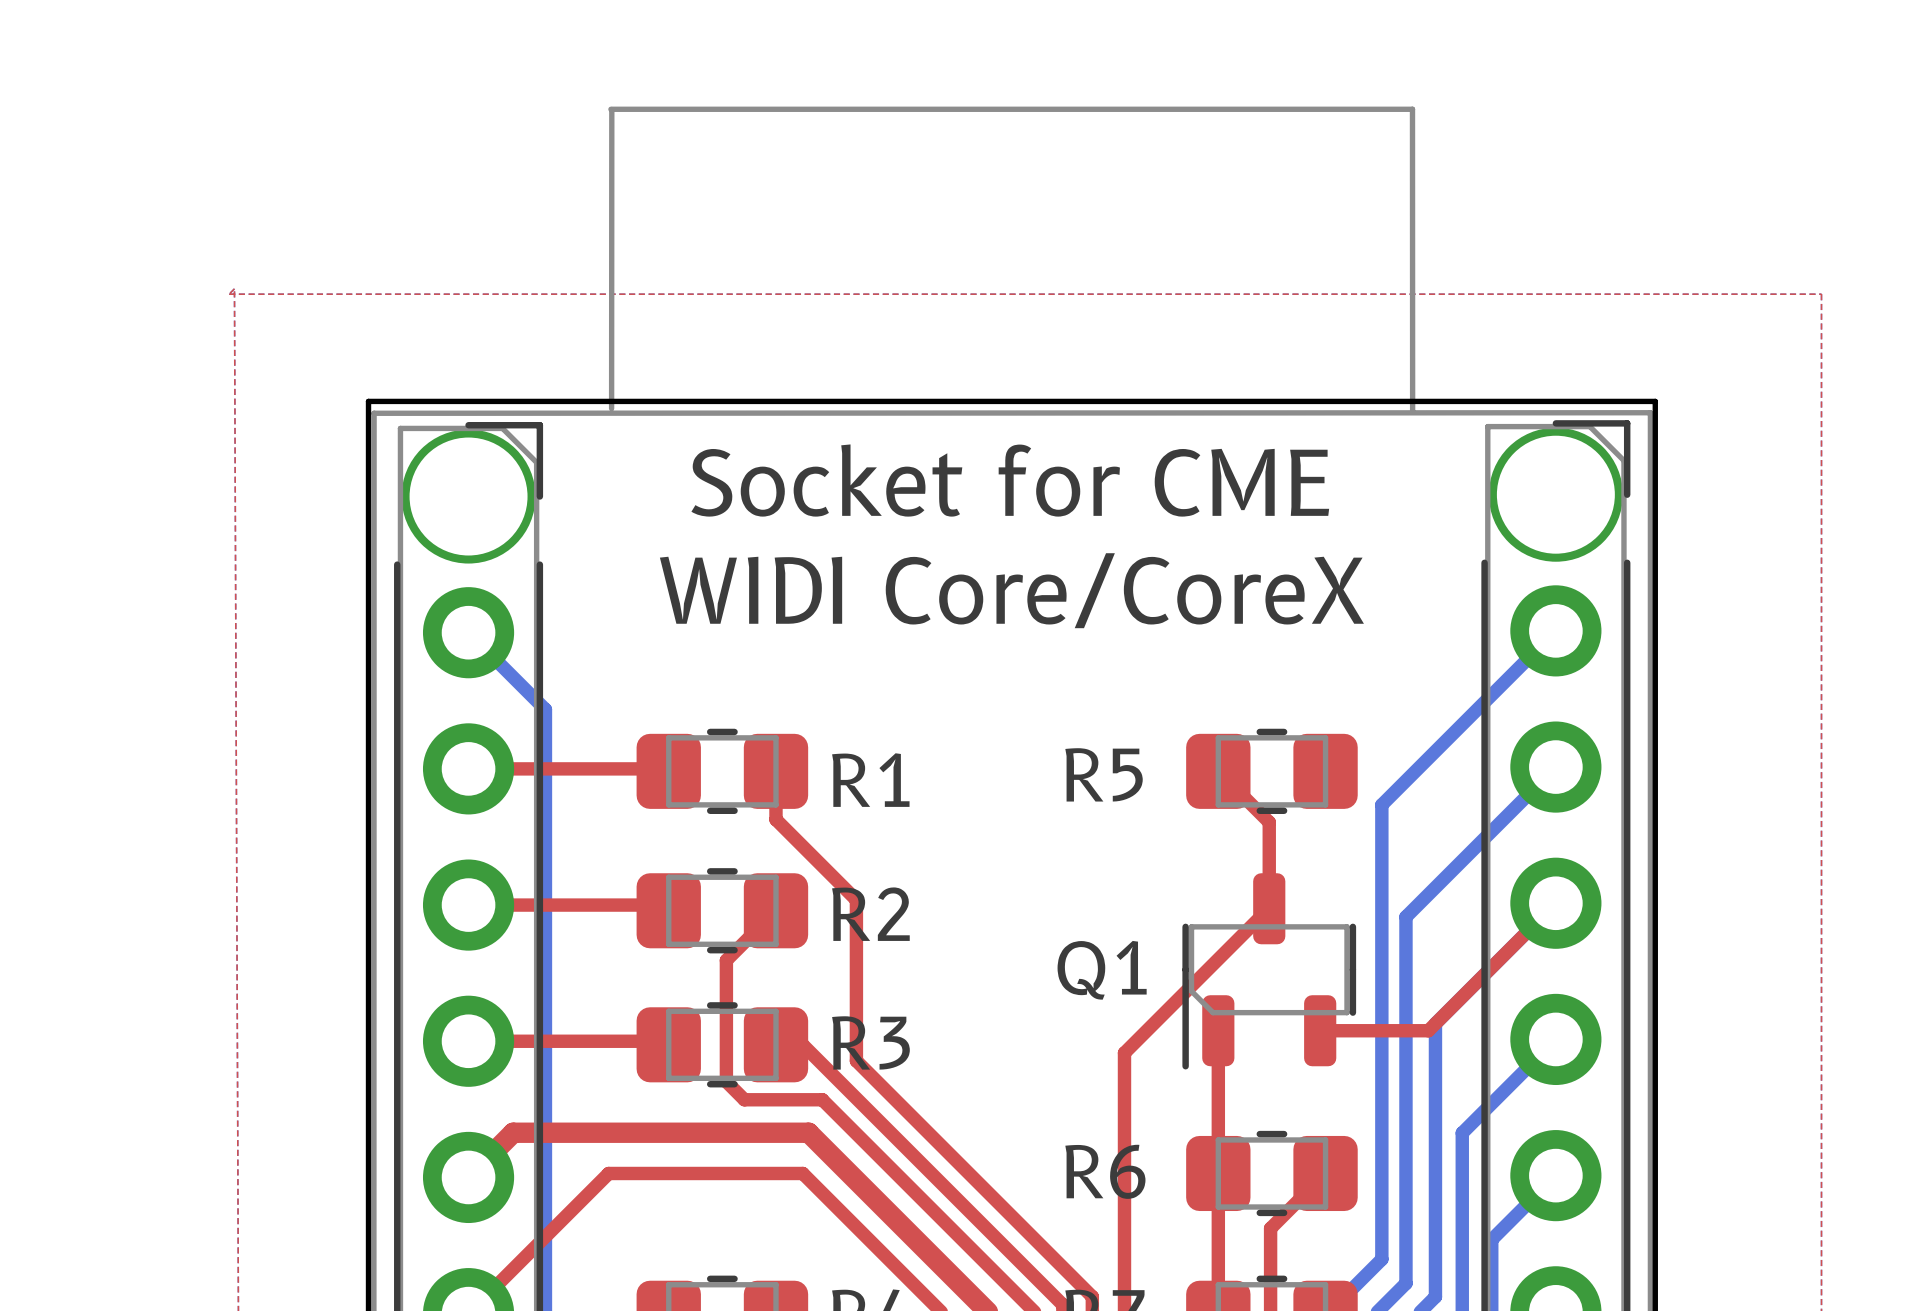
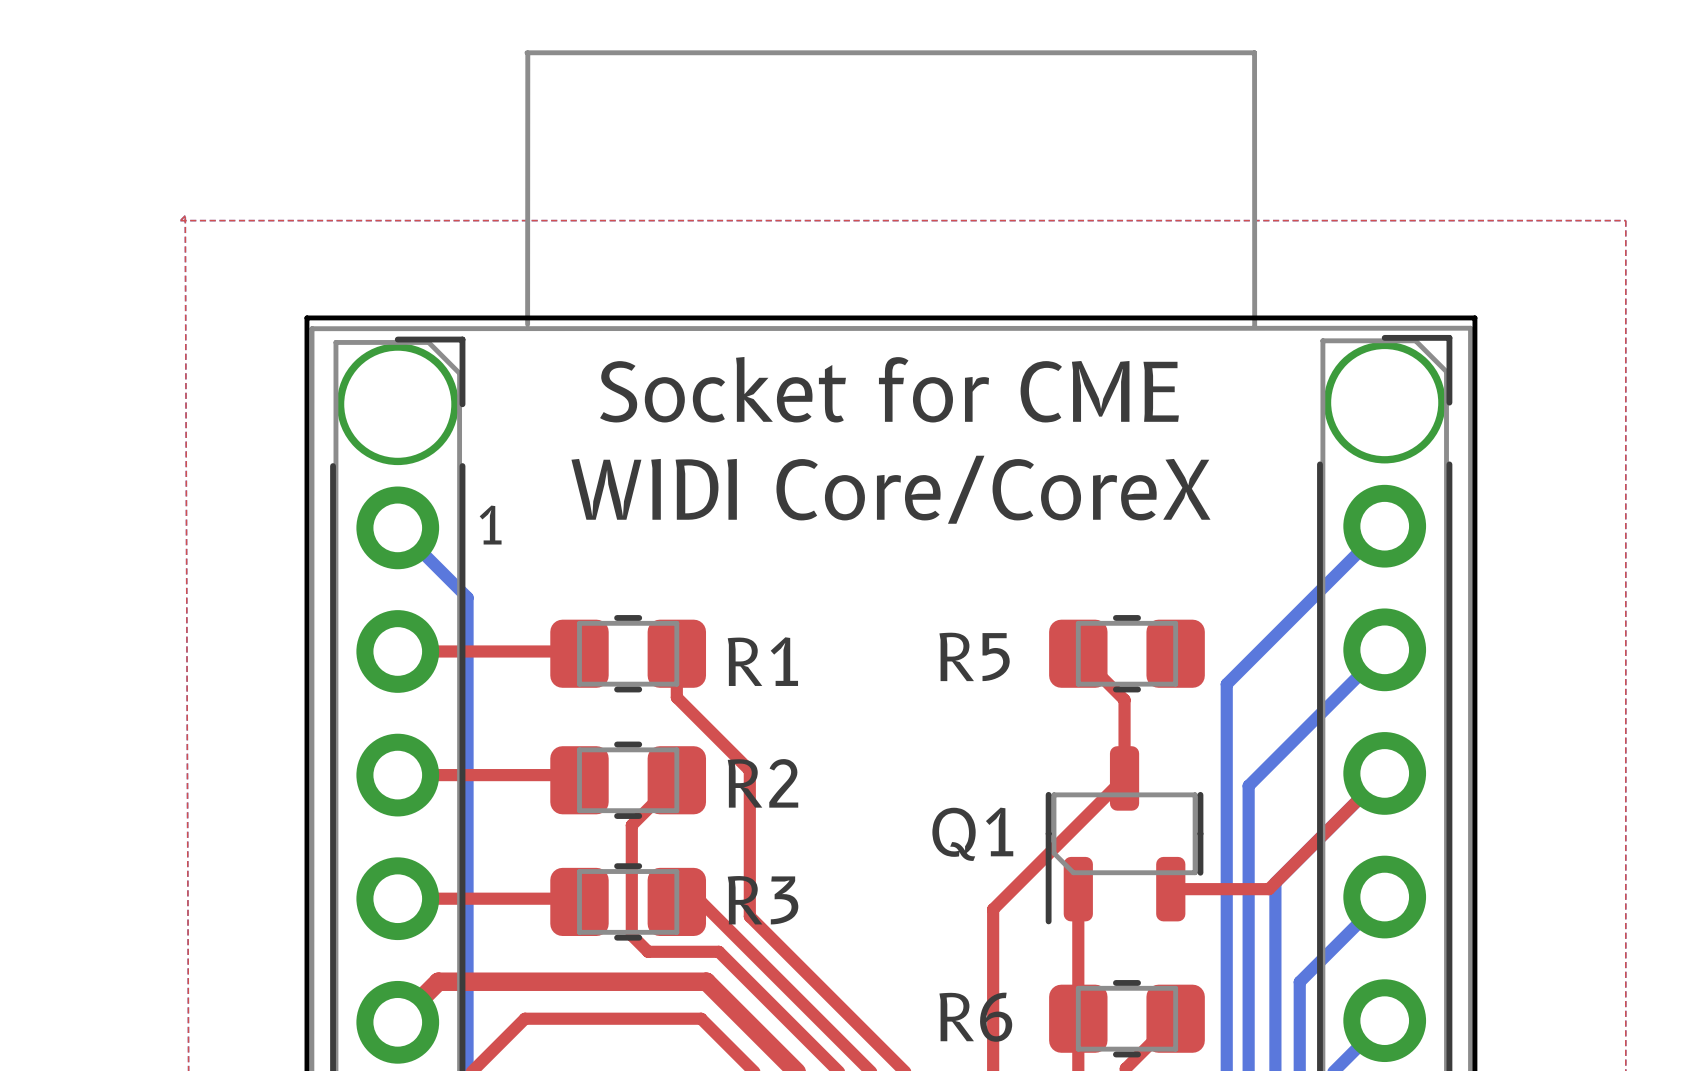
part text: none -> 1 (490, 525)

